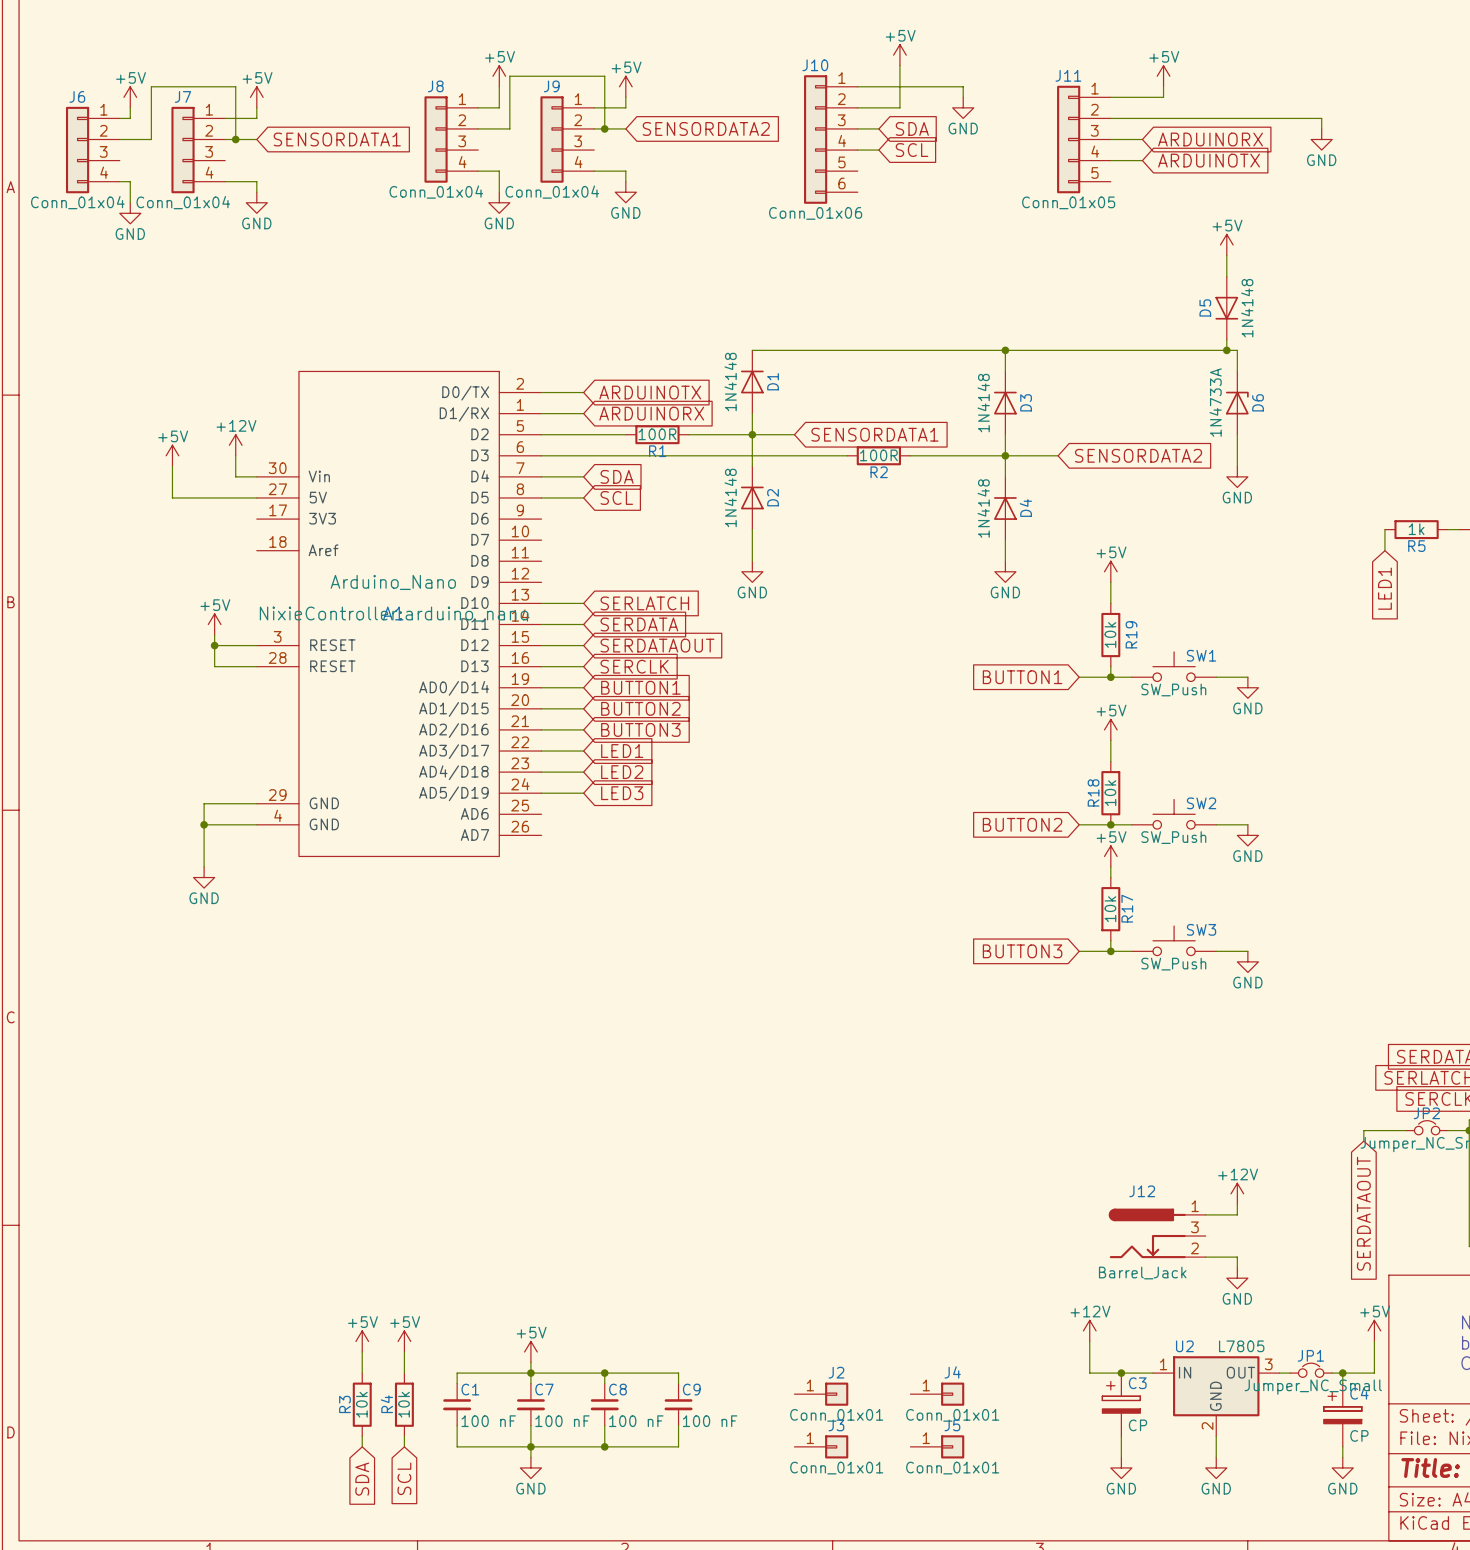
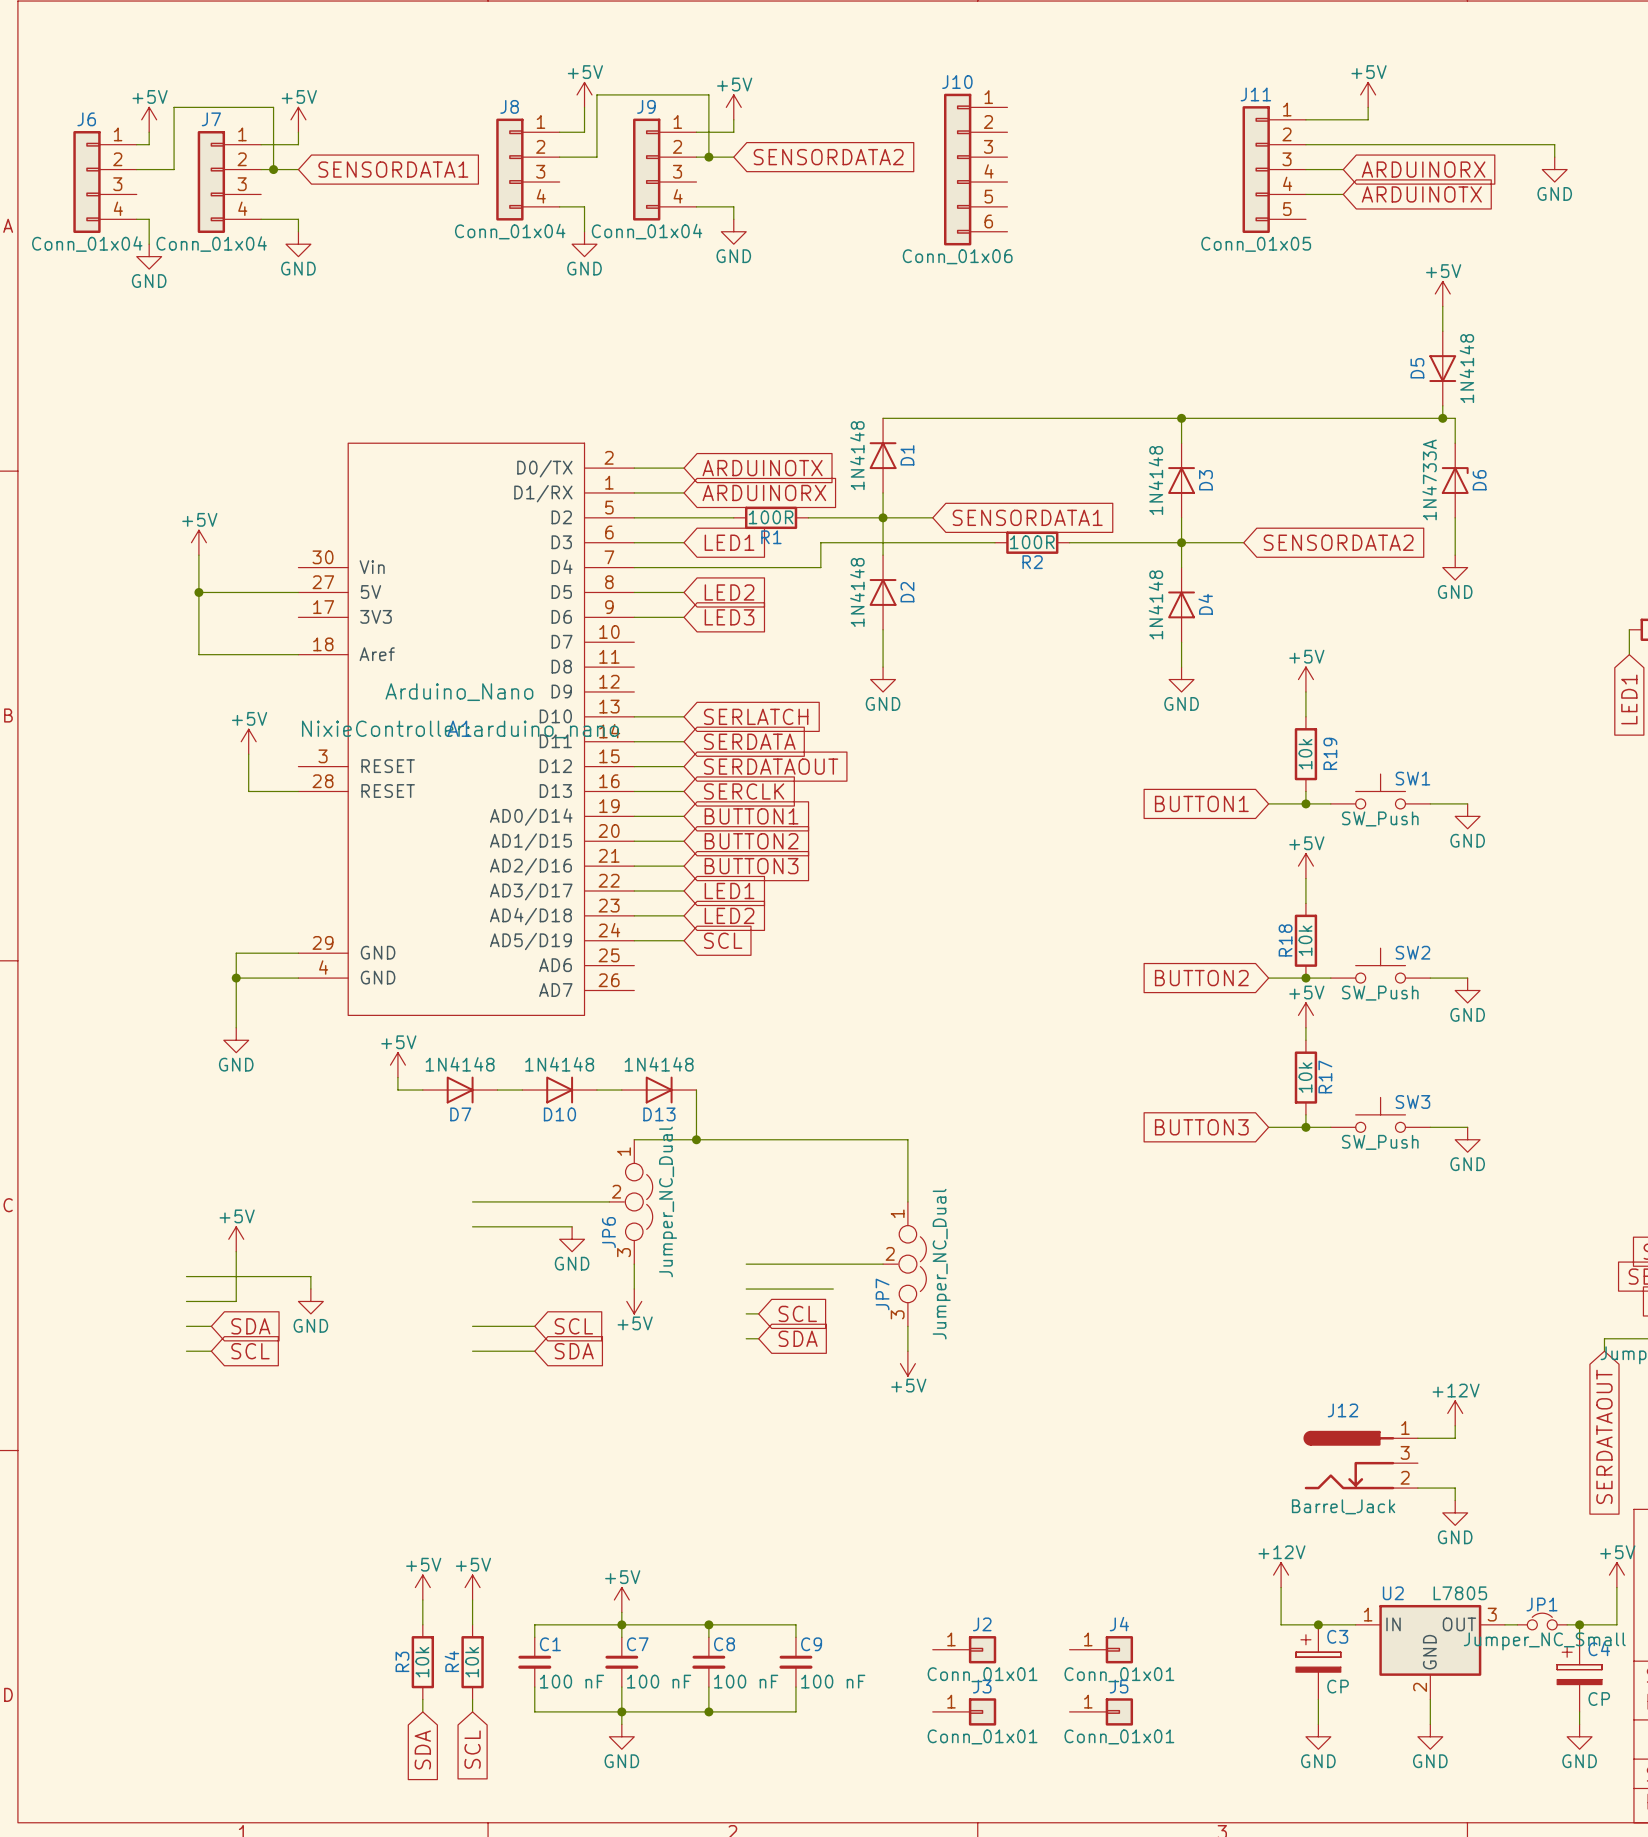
power symbol: +5V (899, 55) -> none
wire: (899, 65) (899, 107) (857, 107) -> none
wire: (857, 86) (963, 86) (963, 97) -> none
power symbol: GND (963, 107) -> none
wire: (857, 128) (878, 128) -> none
global label: SDA (912, 128) -> none
wire: (857, 150) (878, 150) -> none
global label: SCL (912, 150) -> none
power symbol: +12V (235, 445) -> none
wire: (235, 455) (235, 476) (256, 476) -> none
wire: (583, 455) (699, 455) -> (684, 567) (820, 567) (820, 542)
global label: none -> LED1 (729, 542)
global label: SDA (617, 476) -> none
wire: none -> (198, 592) (198, 654) (298, 654)
junction: none -> (198, 592)
global label: SCL (616, 497) -> LED2 (729, 592)
wire: none -> (634, 617) (684, 617)
global label: none -> LED3 (729, 617)
wire: (214, 645) (256, 645) -> none
junction: (214, 645) -> none
global label: LED3 (622, 793) -> SCL (723, 940)
power symbol: none -> +5V (397, 1065)
wire: none -> (397, 1077) (397, 1090) (422, 1090)
D7: none -> 1N4148 (460, 1090)
wire: none -> (497, 1090) (522, 1090)
D10: none -> 1N4148 (559, 1090)
wire: none -> (596, 1090) (621, 1090)
D13: none -> 1N4148 (659, 1090)
wire: none -> (696, 1090) (696, 1139)
wire: none -> (634, 1139) (907, 1139) (907, 1201)
junction: none -> (696, 1139)
wire: none -> (472, 1201) (609, 1201)
JP6: none -> Jumper_NC_Dual (631, 1201)
wire: none -> (472, 1226) (572, 1226)
power symbol: none -> +5V (236, 1239)
power symbol: none -> GND (572, 1239)
wire: none -> (236, 1251) (236, 1301) (186, 1301)
wire: none -> (634, 1264) (634, 1289)
wire: none -> (746, 1264) (883, 1264)
JP7: none -> Jumper_NC_Dual (904, 1264)
wire: none -> (186, 1276) (310, 1276) (310, 1289)
wire: none -> (746, 1289) (833, 1289)
power symbol: none -> GND (310, 1301)
power symbol: none -> +5V (634, 1301)
wire: none -> (746, 1313) (758, 1313)
global label: none -> SCL (797, 1313)
wire: none -> (186, 1326) (211, 1326)
global label: none -> SDA (250, 1326)
wire: none -> (472, 1326) (534, 1326)
global label: none -> SCL (573, 1326)
wire: none -> (907, 1326) (907, 1351)
wire: none -> (746, 1338) (758, 1338)
global label: none -> SDA (798, 1338)
wire: none -> (186, 1351) (211, 1351)
global label: none -> SCL (250, 1351)
wire: none -> (472, 1351) (534, 1351)
global label: none -> SDA (574, 1351)
power symbol: none -> +5V (907, 1363)

